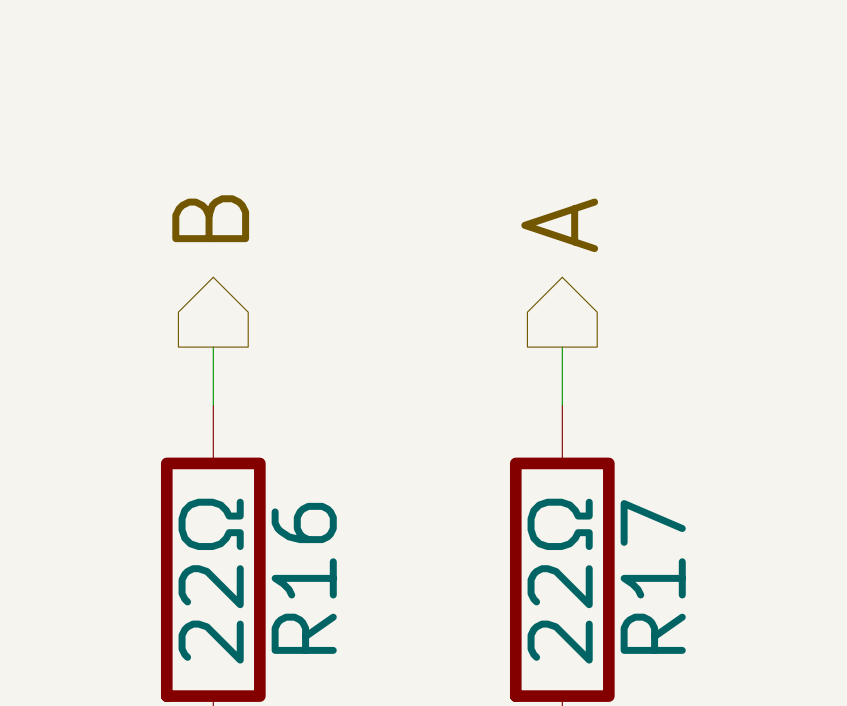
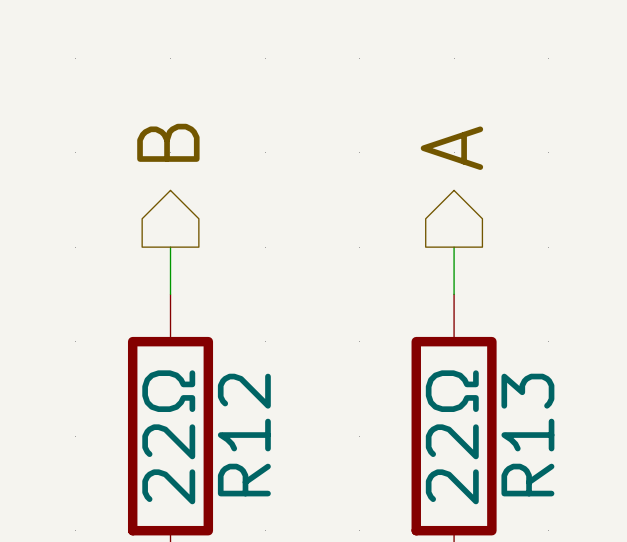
R17 name: R17 (653, 577) -> R13 (527, 435)
R16 name: R16 (304, 578) -> R12 (244, 435)

